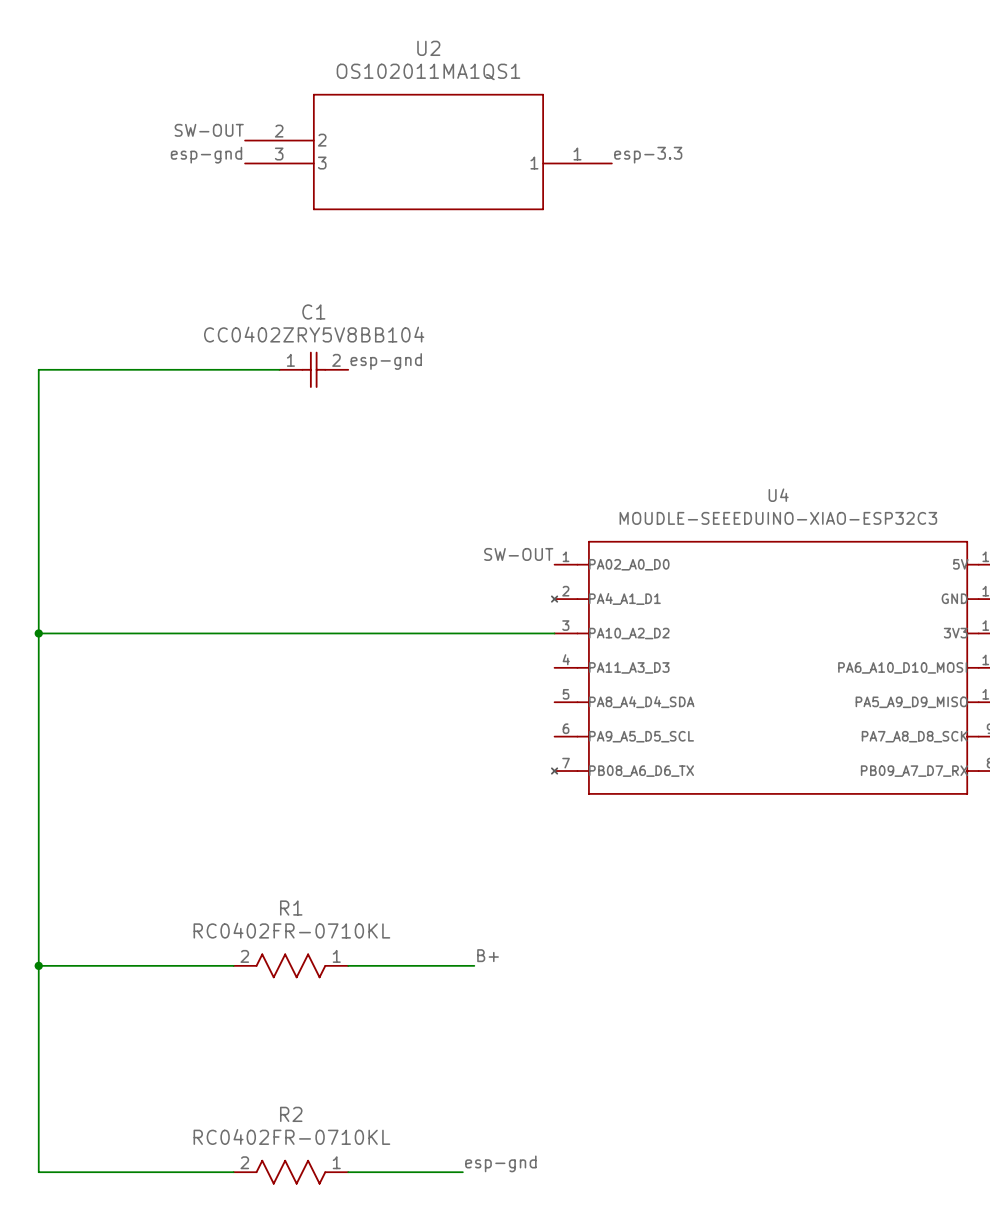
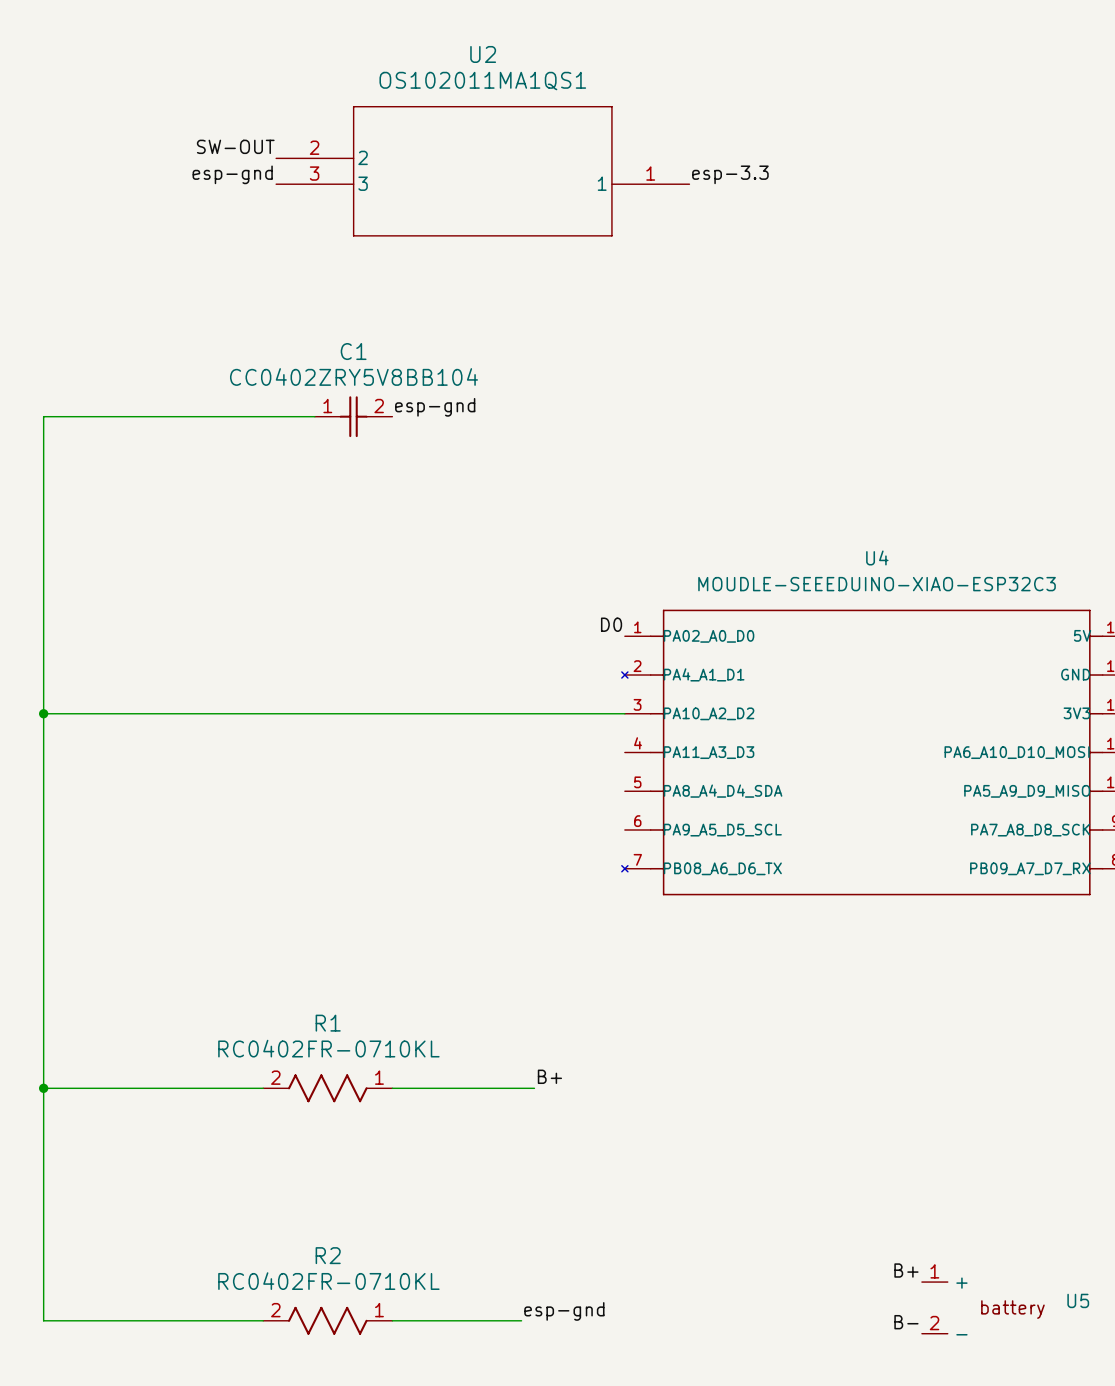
label: SW-OUT (518, 554) -> D0 (611, 624)
label: none -> B+ (906, 1270)
U5: none -> (934, 1307)
label: none -> B- (906, 1322)

